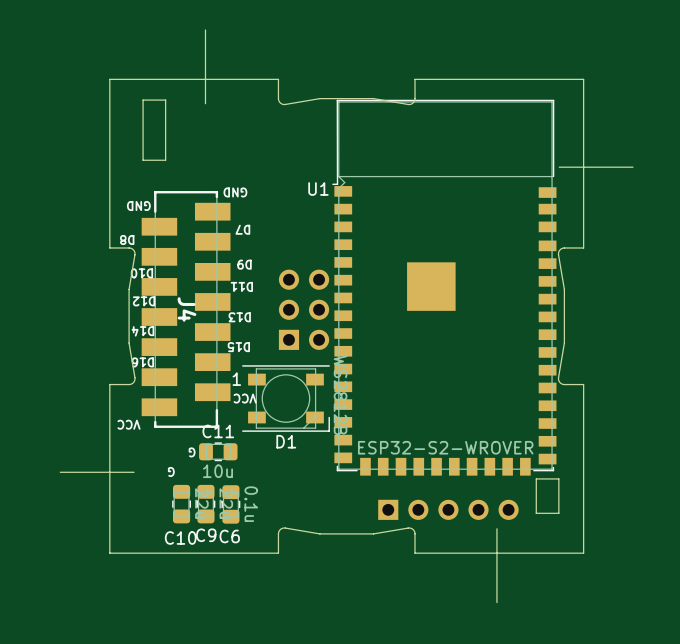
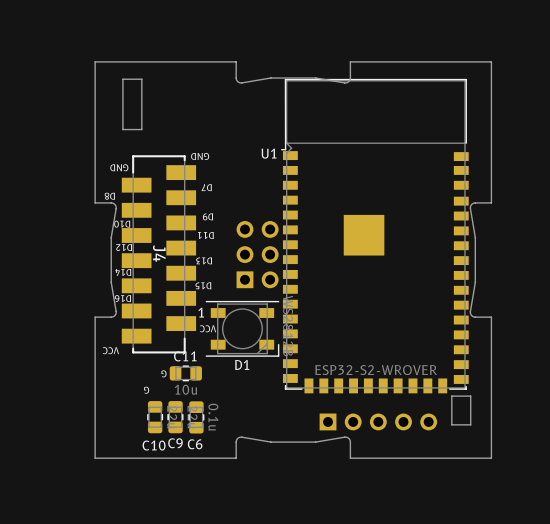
board edge: (205, 29) (205, 103) -> none
board edge: (632, 167) (559, 167) -> none
board edge: (134, 472) (60, 472) -> none
board edge: (496, 528) (496, 602) -> none

